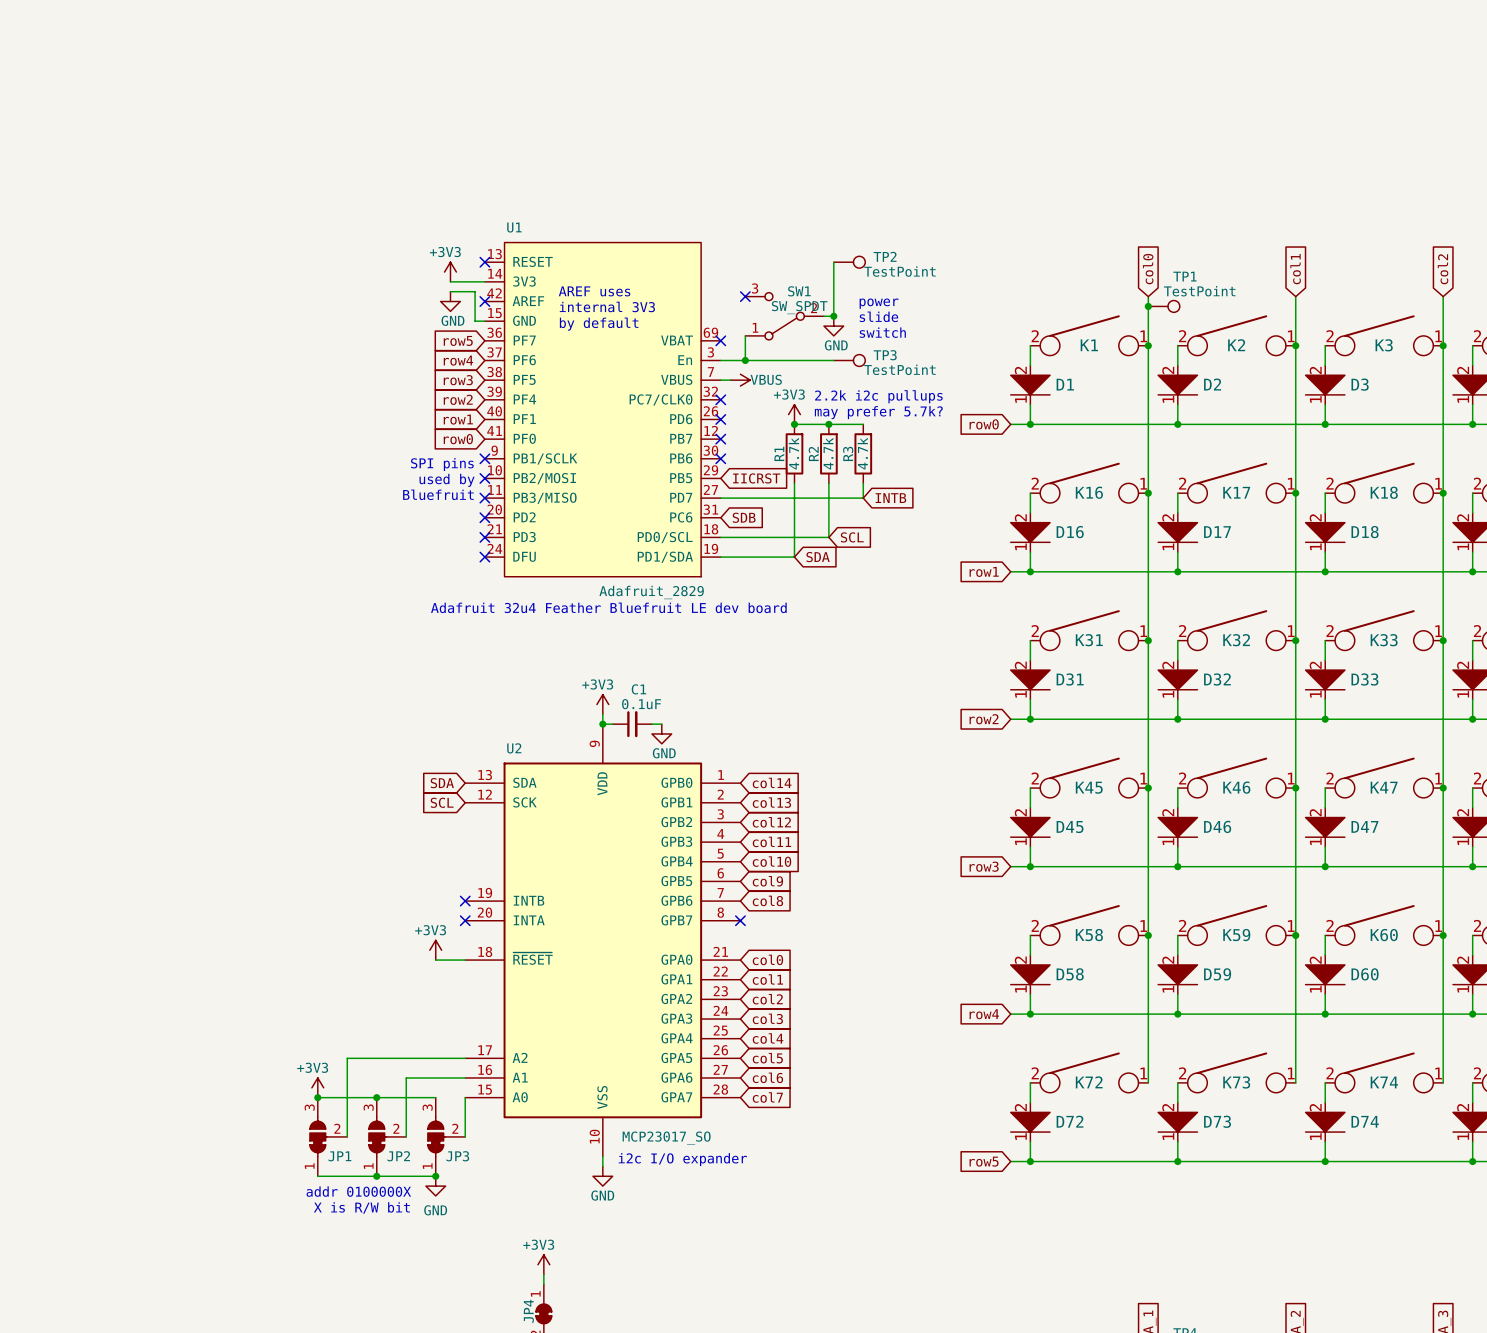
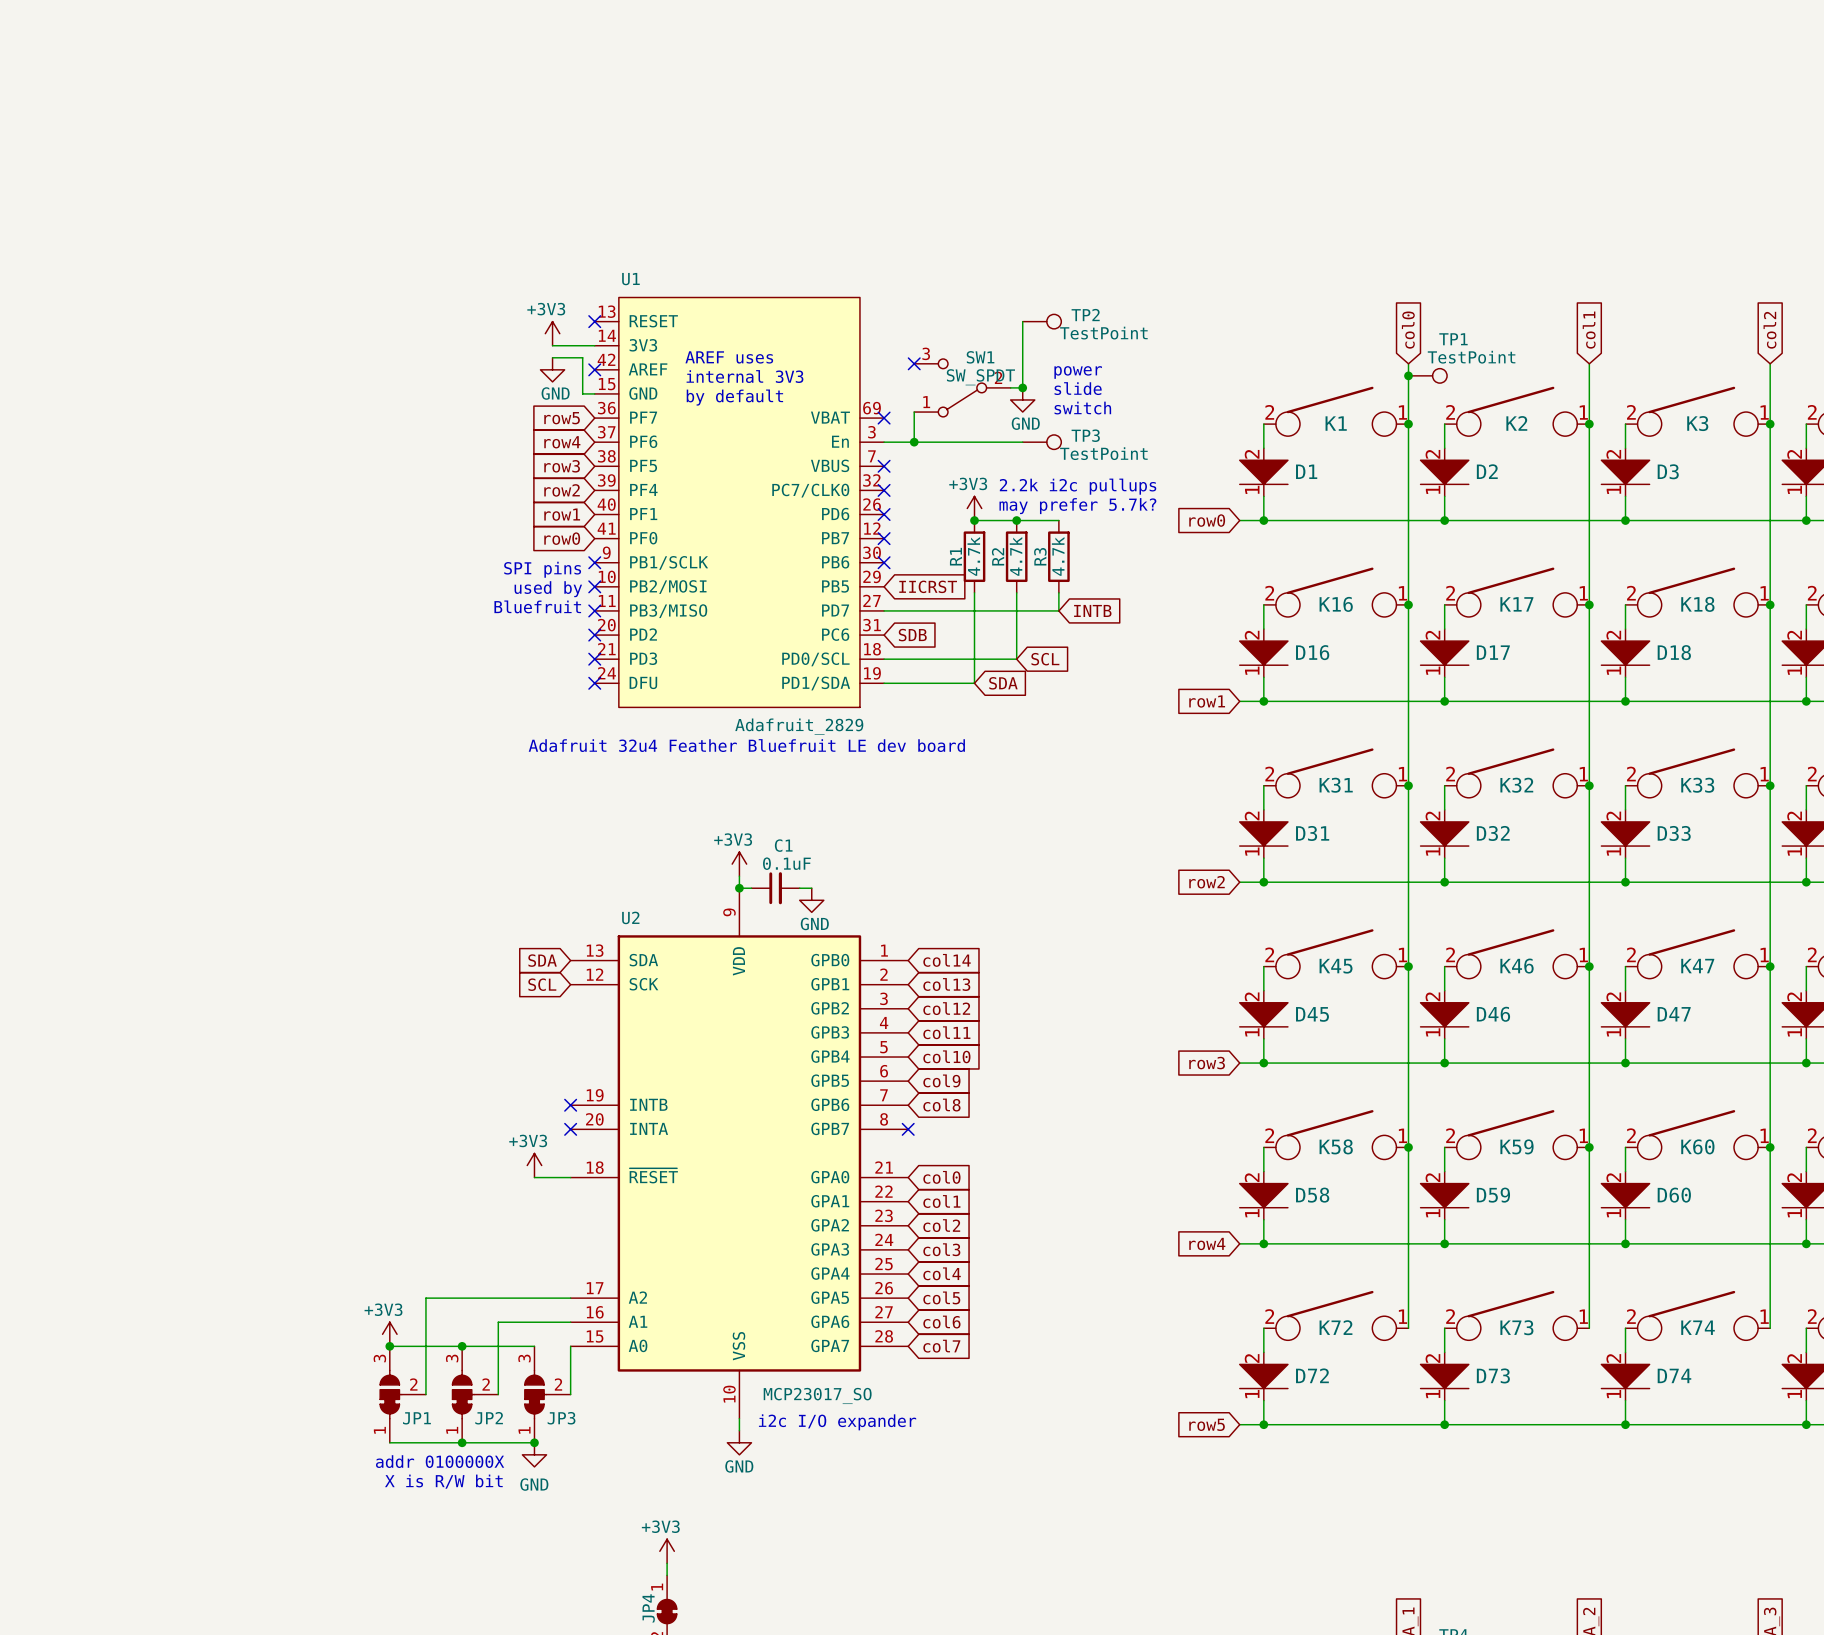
wire: (720, 380) (730, 380) -> none
no-connect mark: none -> (884, 466)
power symbol: VBUS (740, 380) -> none

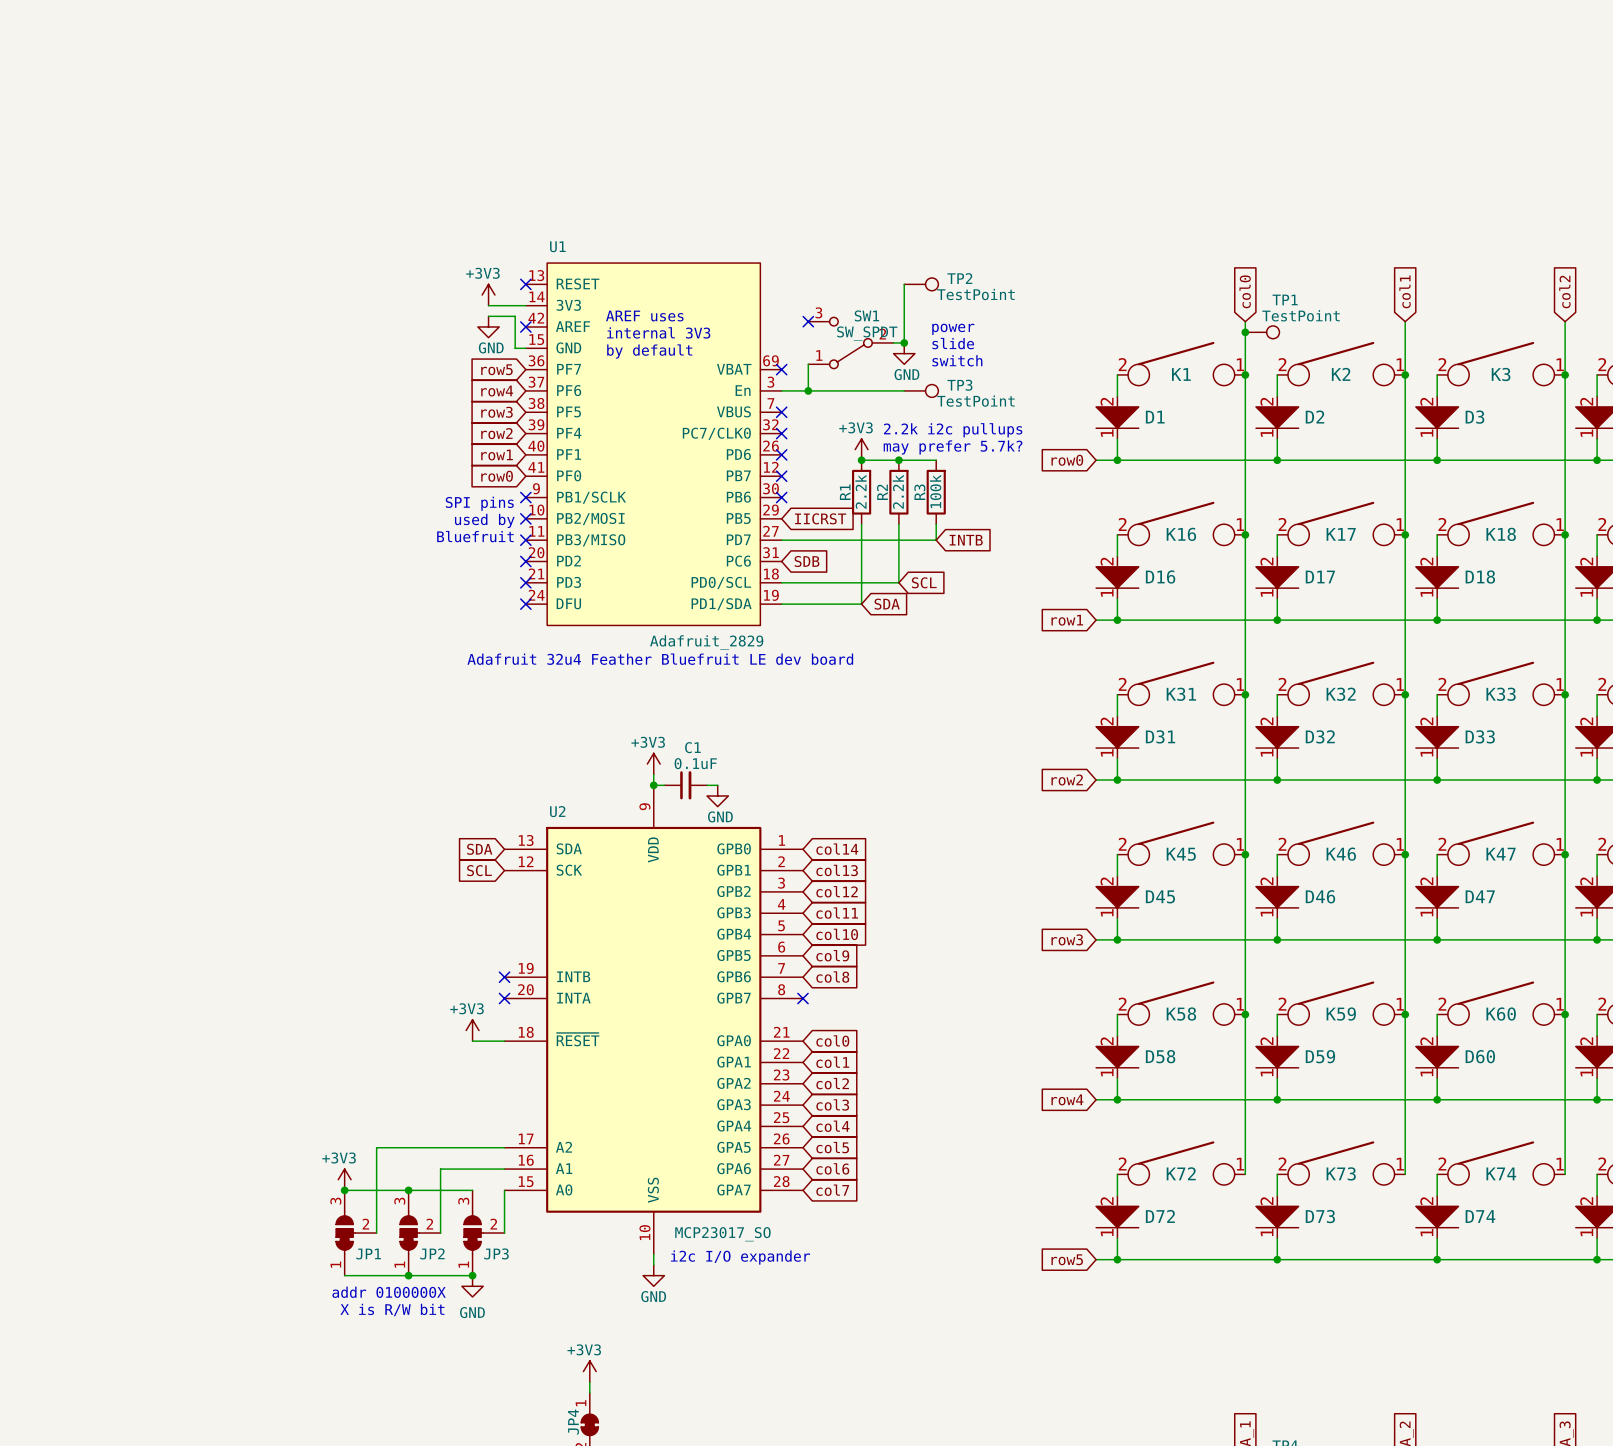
R1 value: 4.7k (973, 556) -> 2.2k (860, 491)
R2 value: 4.7k (1015, 556) -> 2.2k (898, 491)
R3 value: 4.7k (1058, 556) -> 100k (935, 491)

